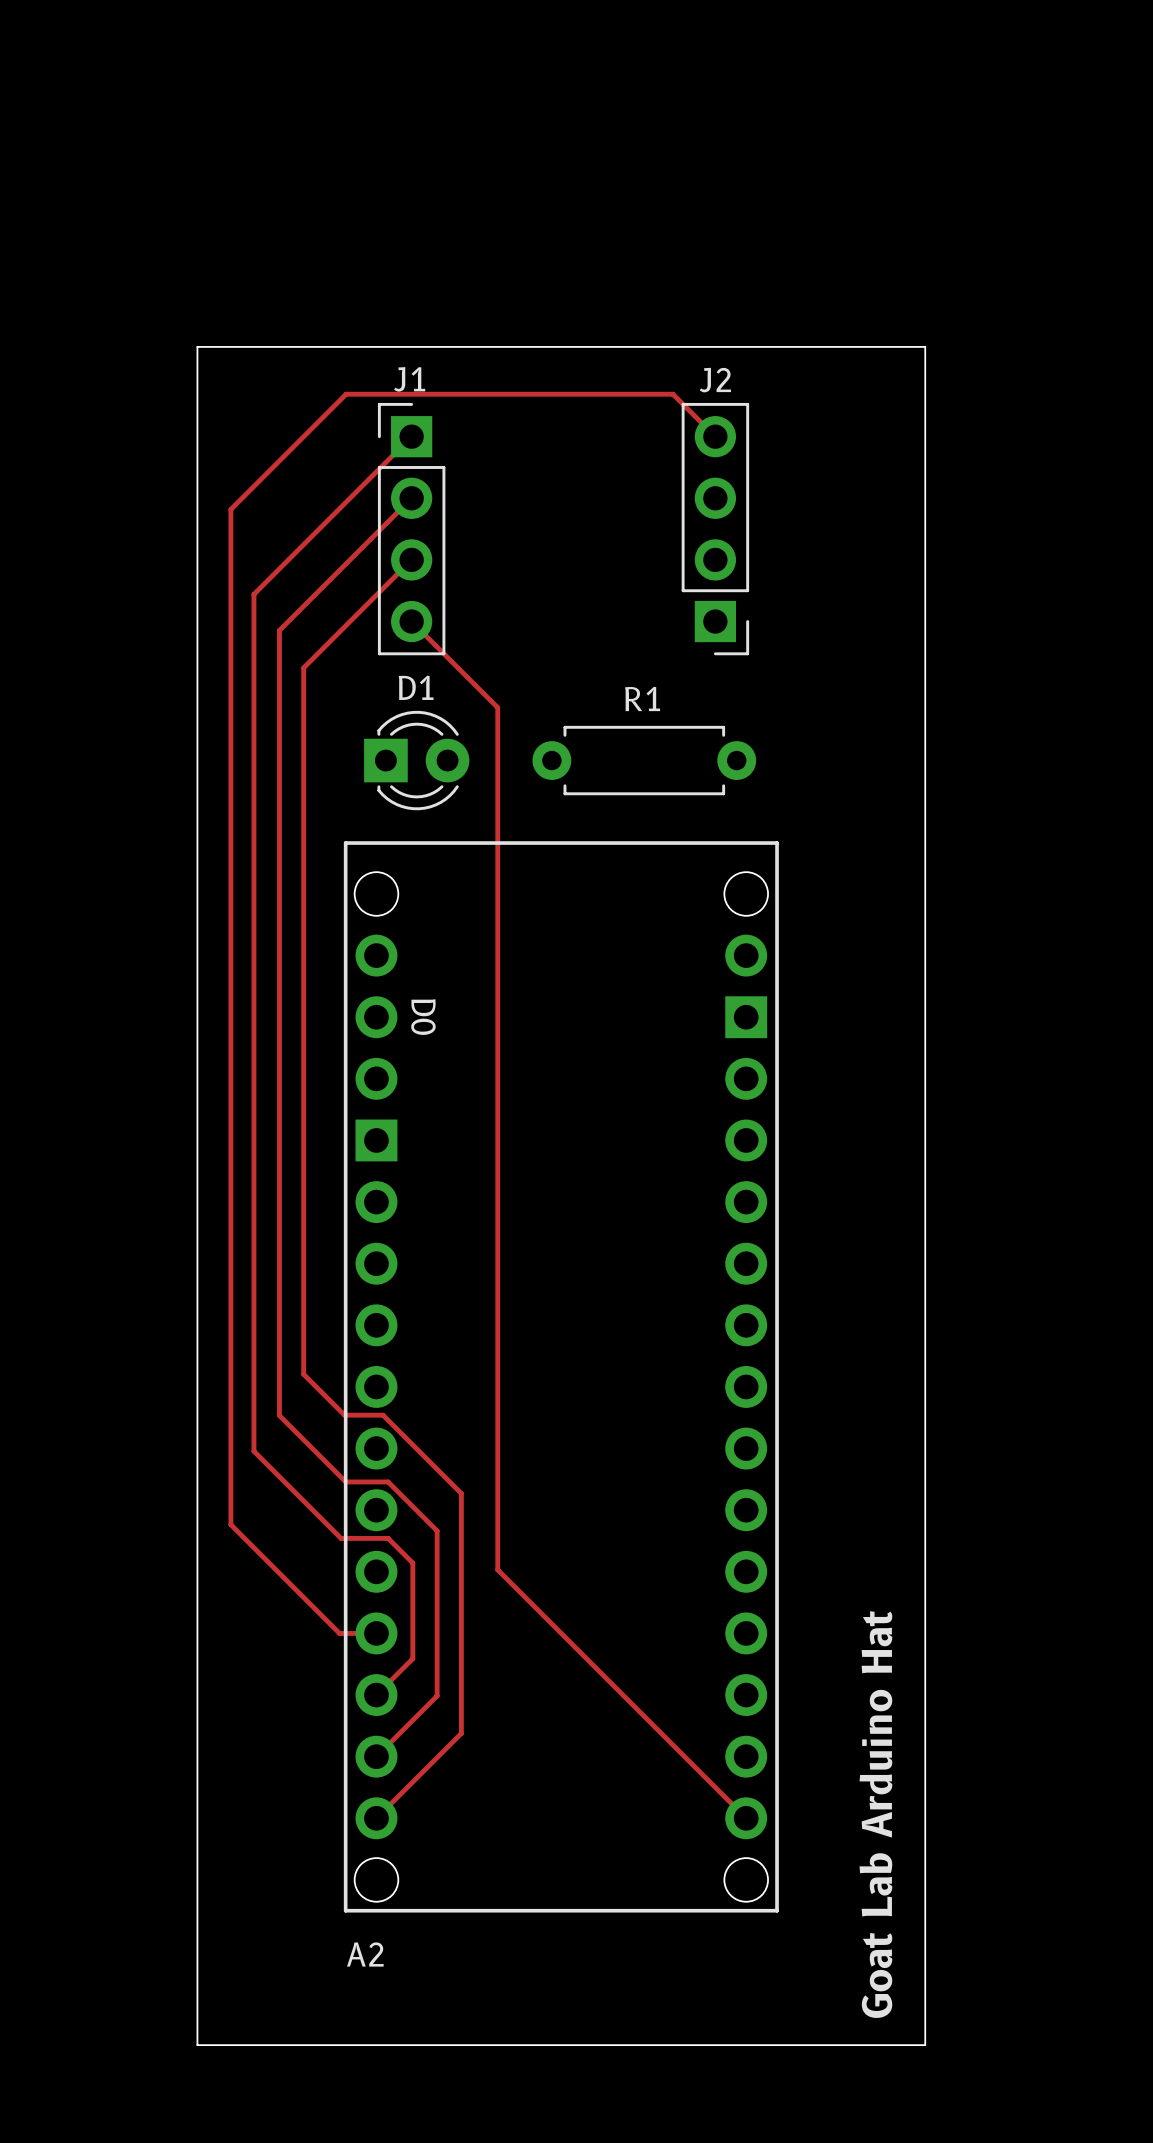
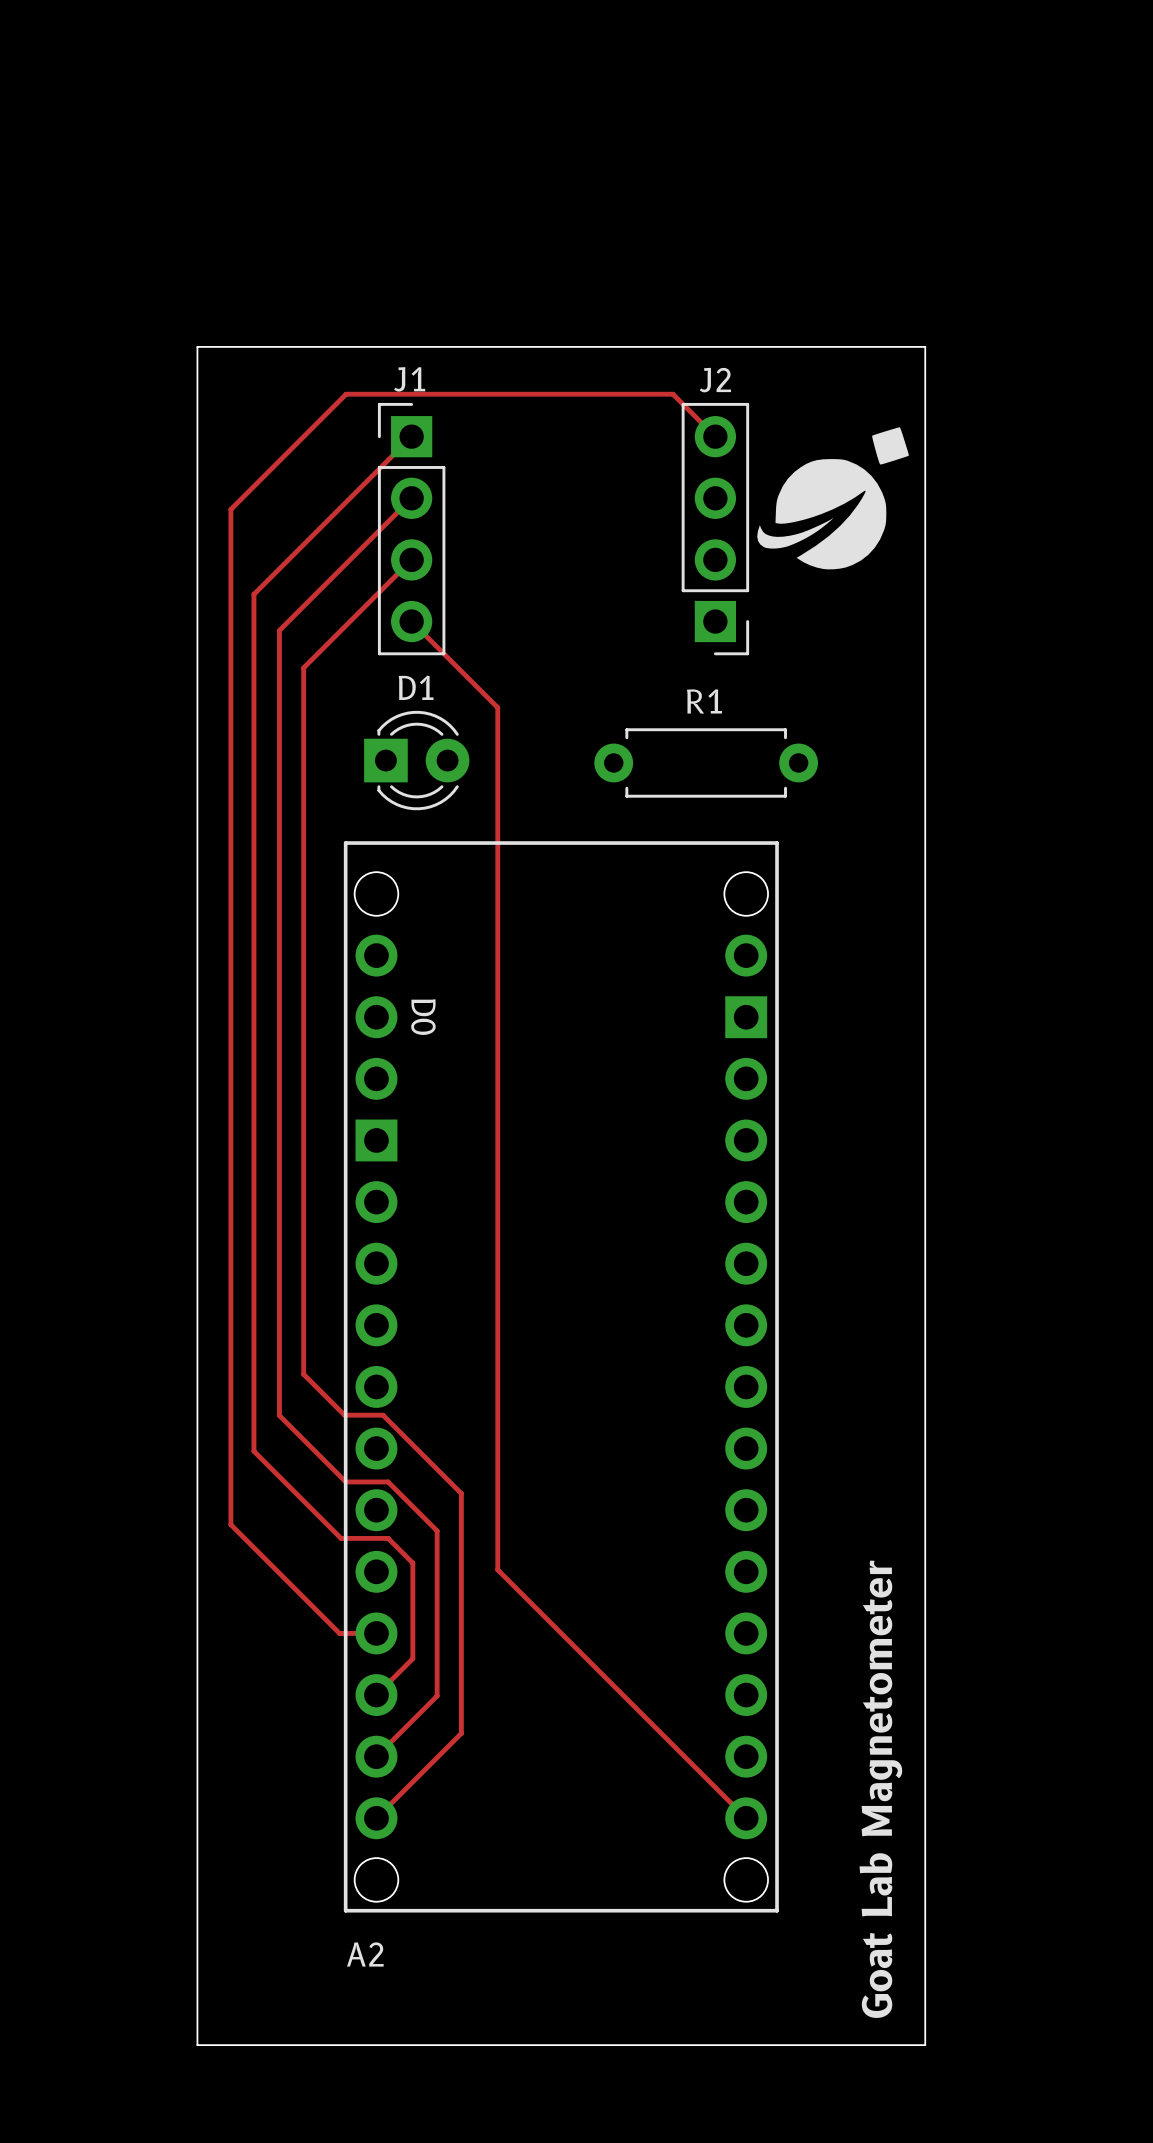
drawing: none -> [757, 427, 909, 570]
R1 position: (644, 760) -> (706, 762)
text: Goat Lab Arduino Hat (875, 1814) -> Goat Lab Magnetometer (880, 1789)

